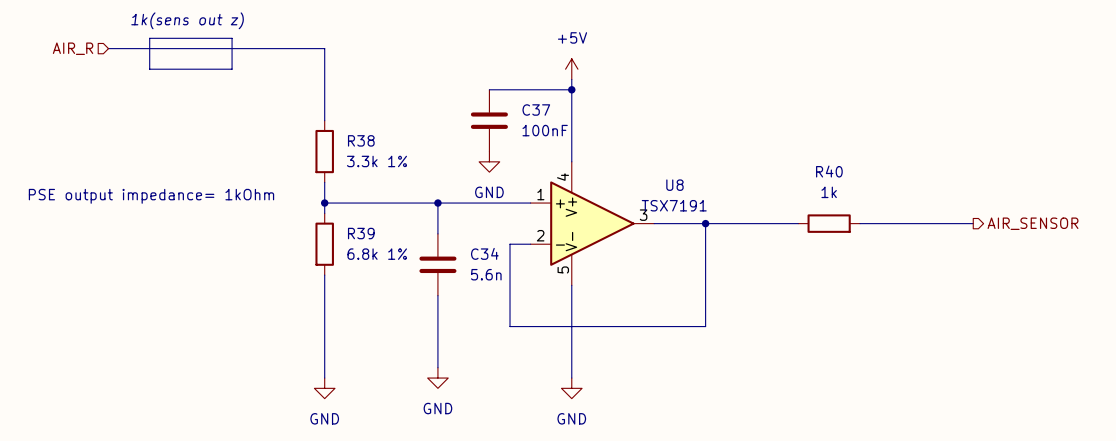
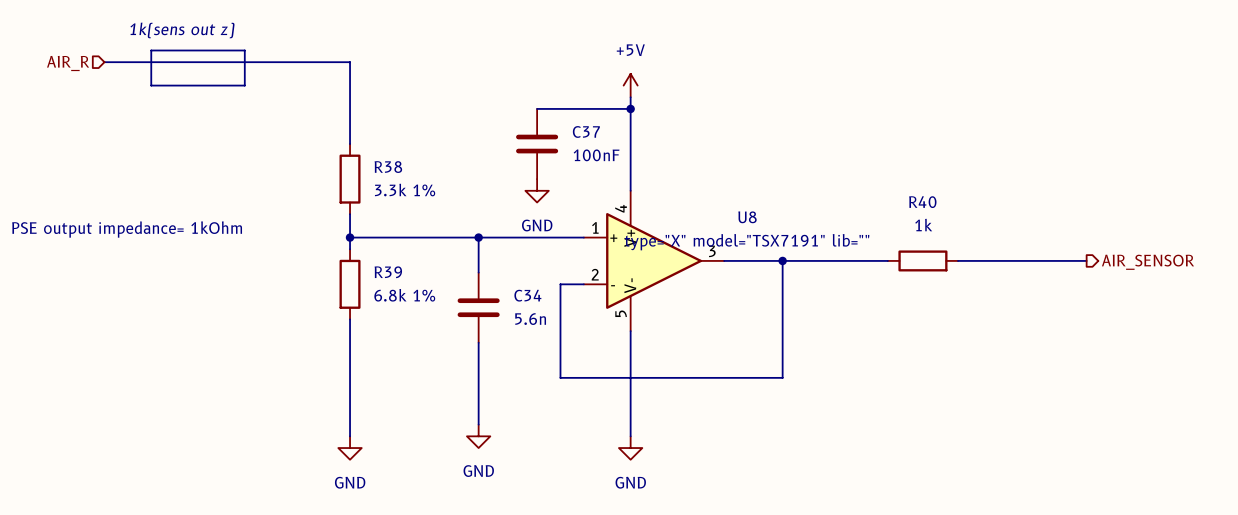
U8 value: TSX7191 (674, 205) -> type="X" model="TSX7191" lib="" (747, 242)

